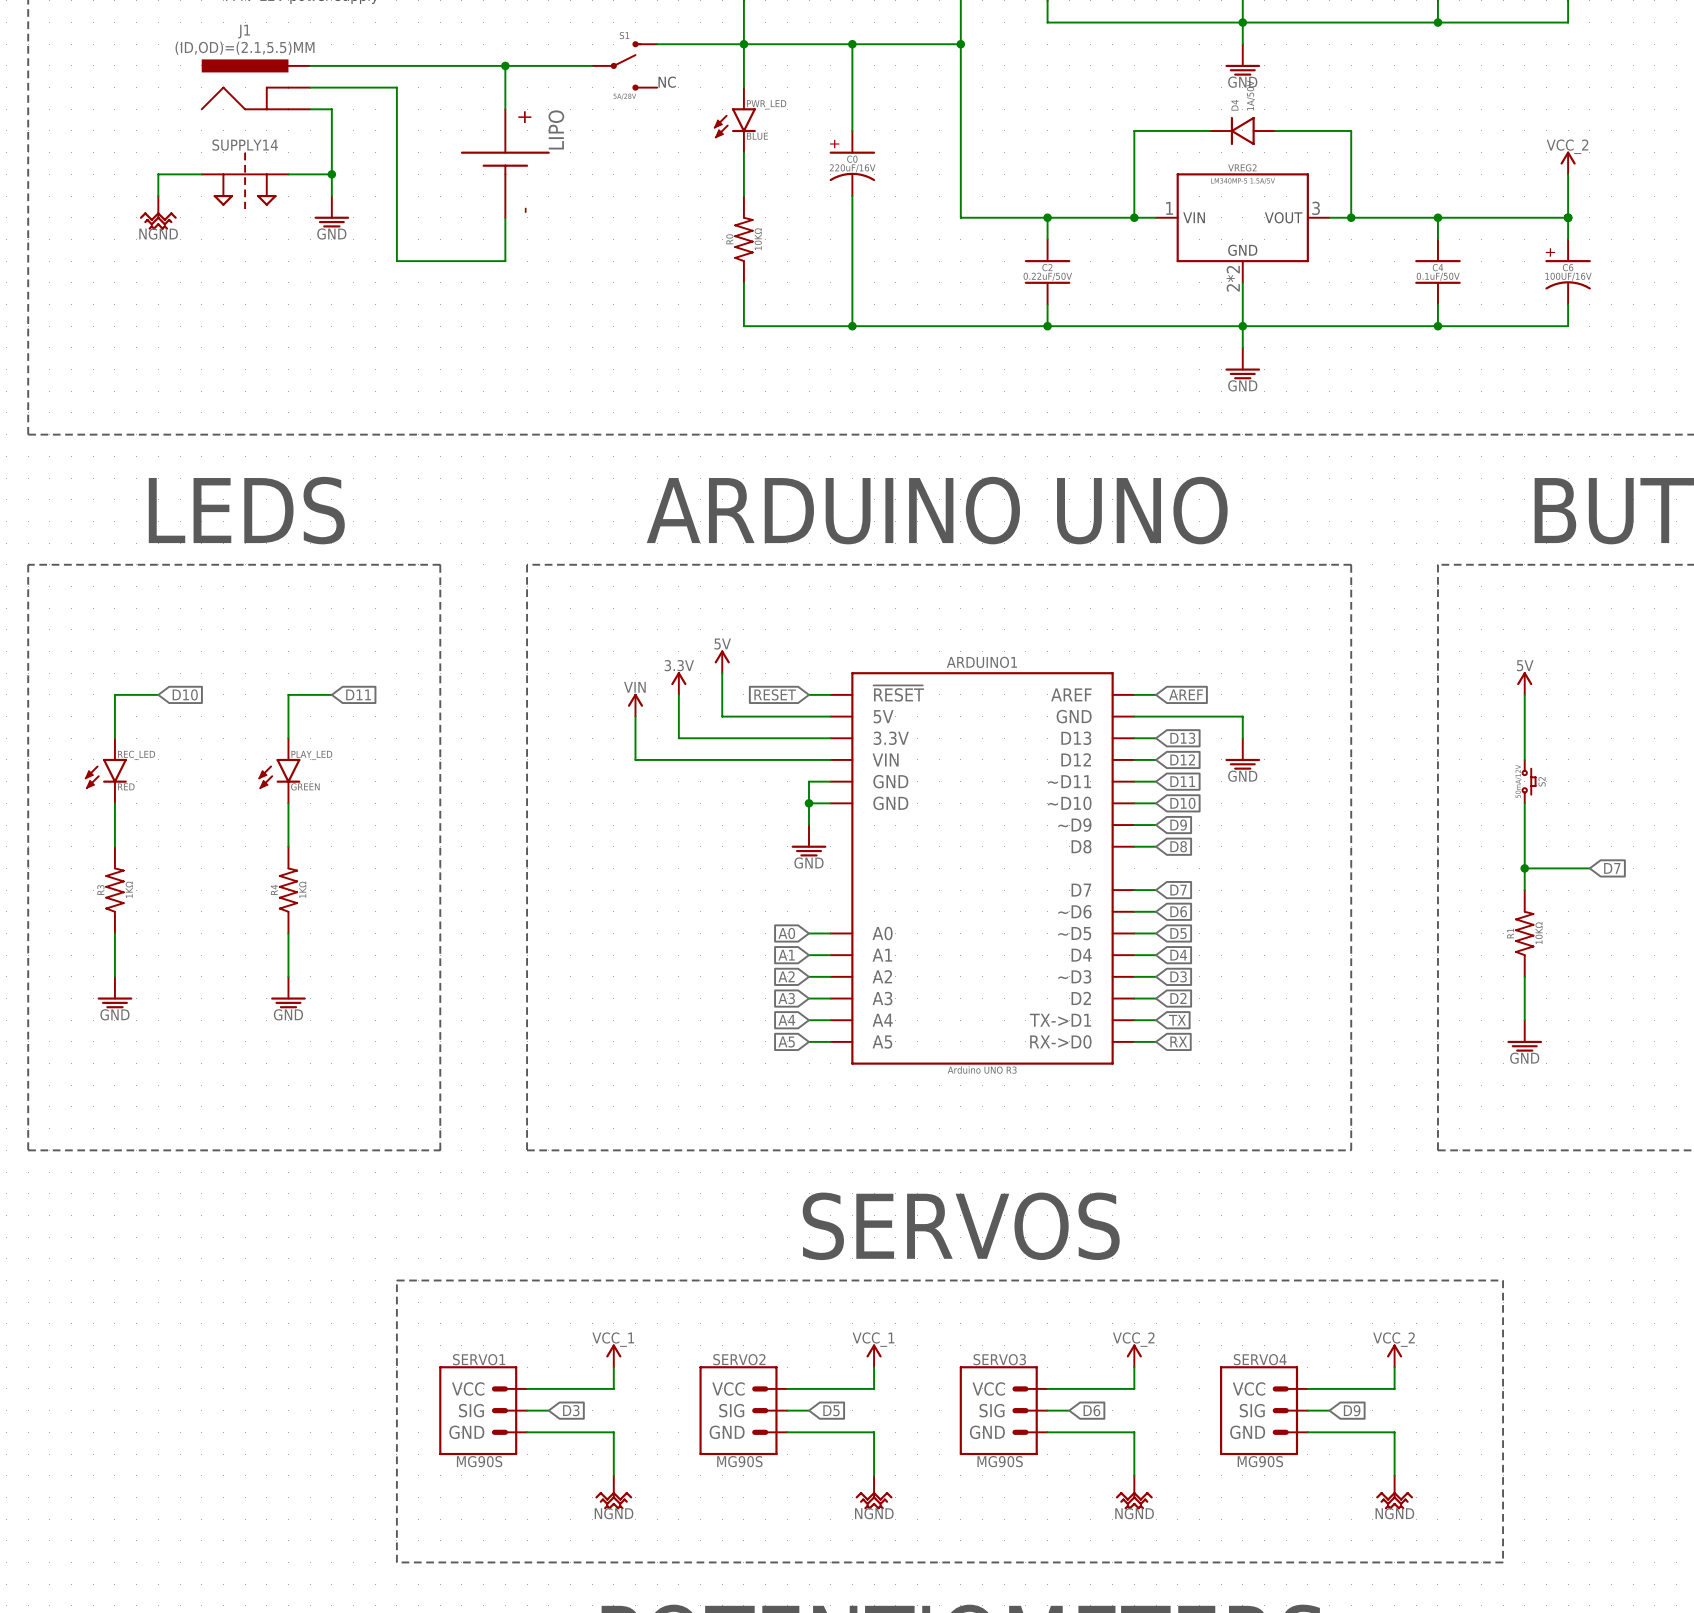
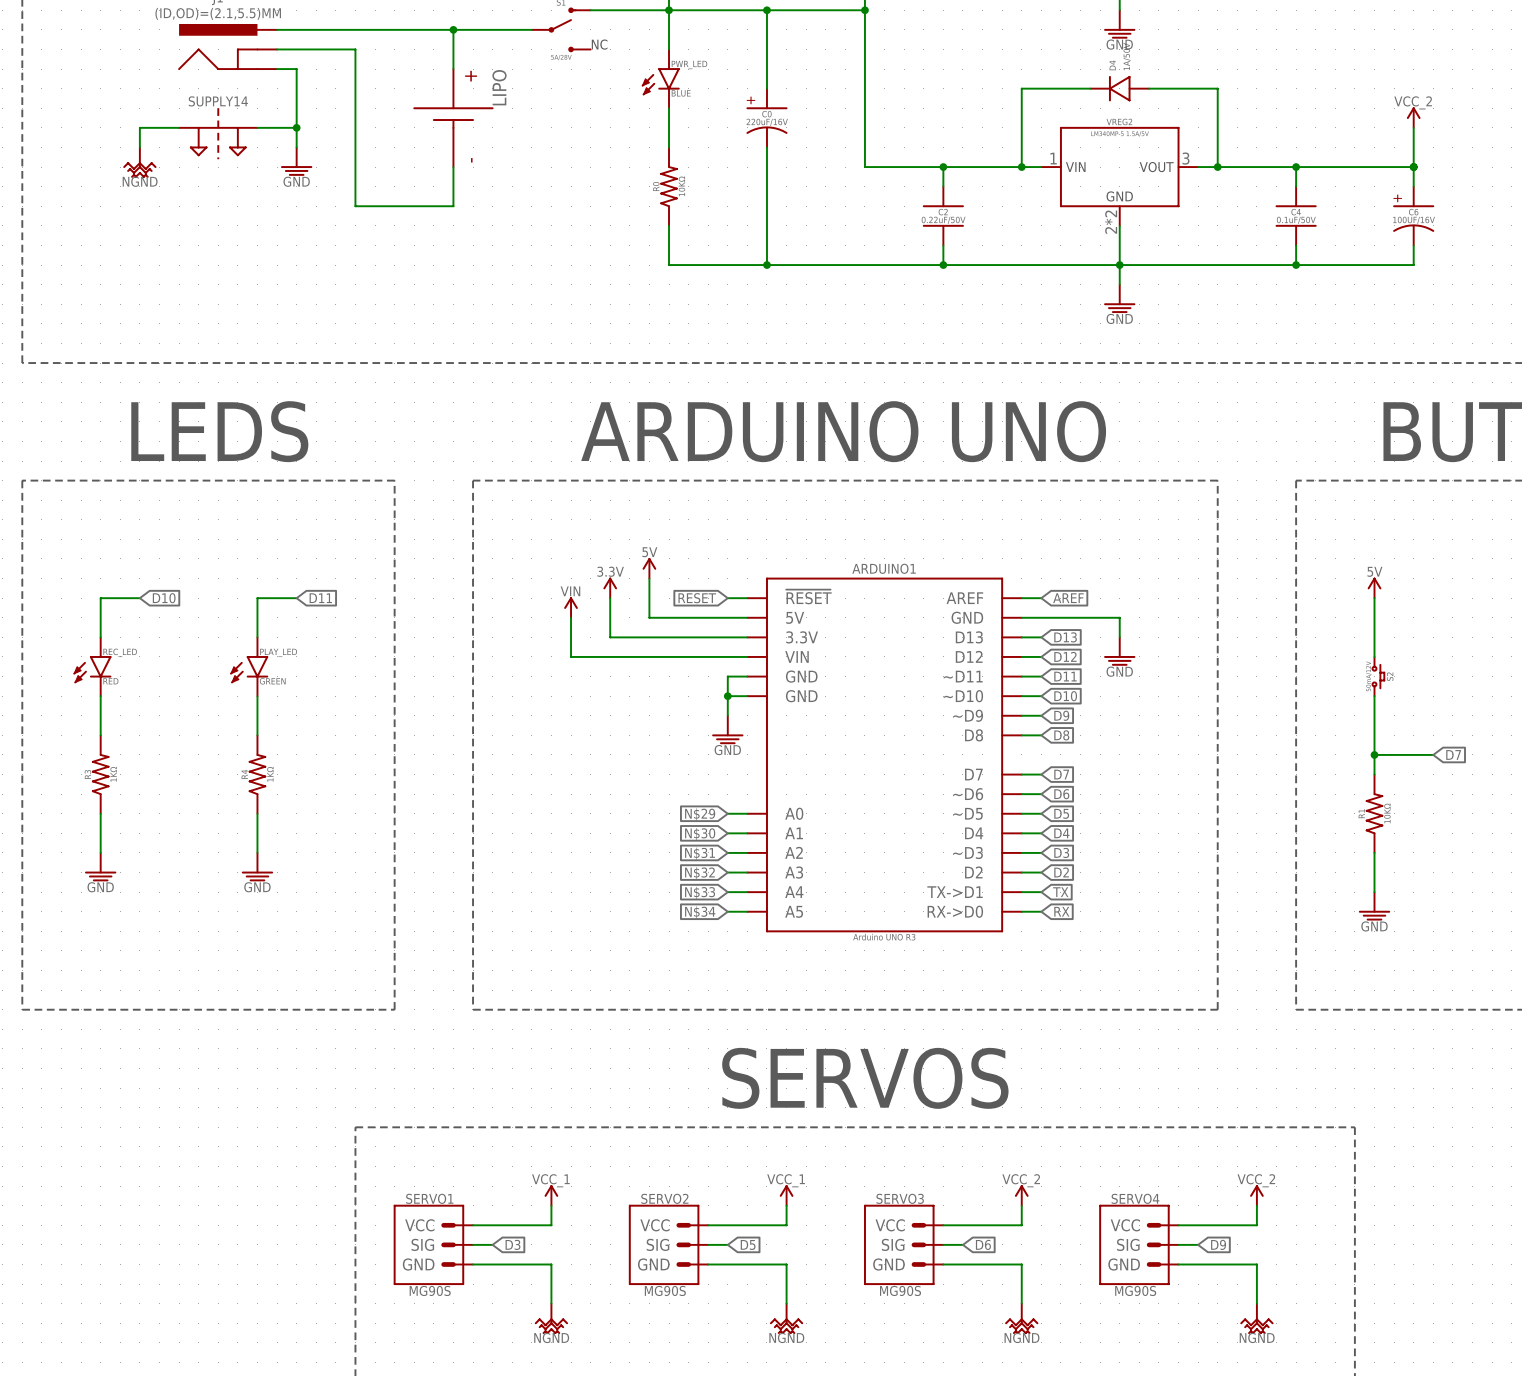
global label: A0 (786, 933) -> N$29 (700, 814)
global label: A1 (786, 955) -> N$30 (700, 834)
global label: A2 (786, 976) -> N$31 (700, 853)
global label: A3 (786, 998) -> N$32 (699, 873)
global label: A4 (786, 1020) -> N$33 (700, 892)
global label: A5 (786, 1042) -> N$34 (700, 912)

